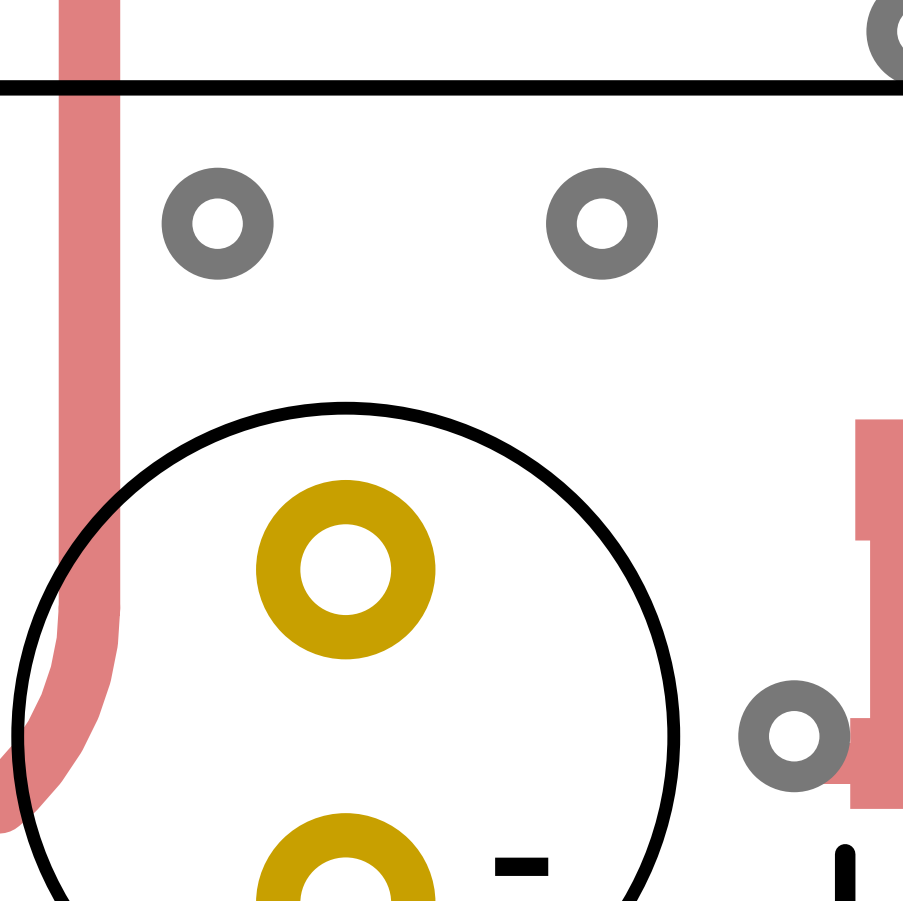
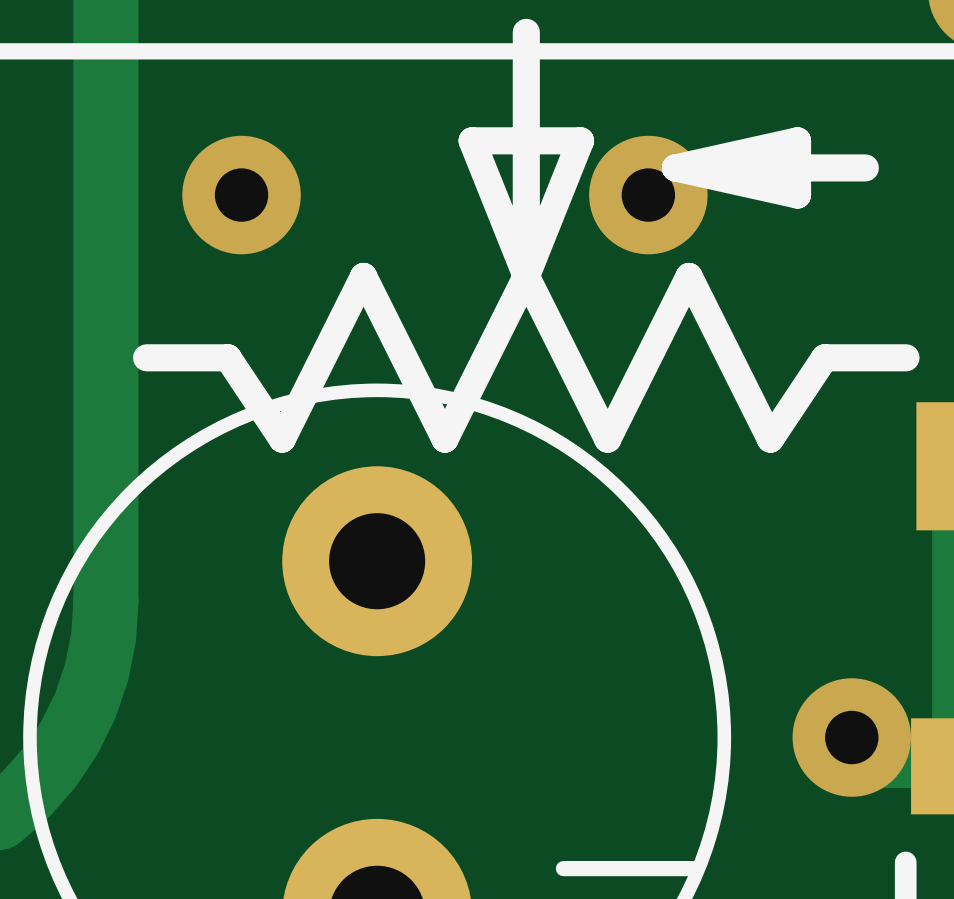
drawing: none -> [133, 18, 920, 453]

